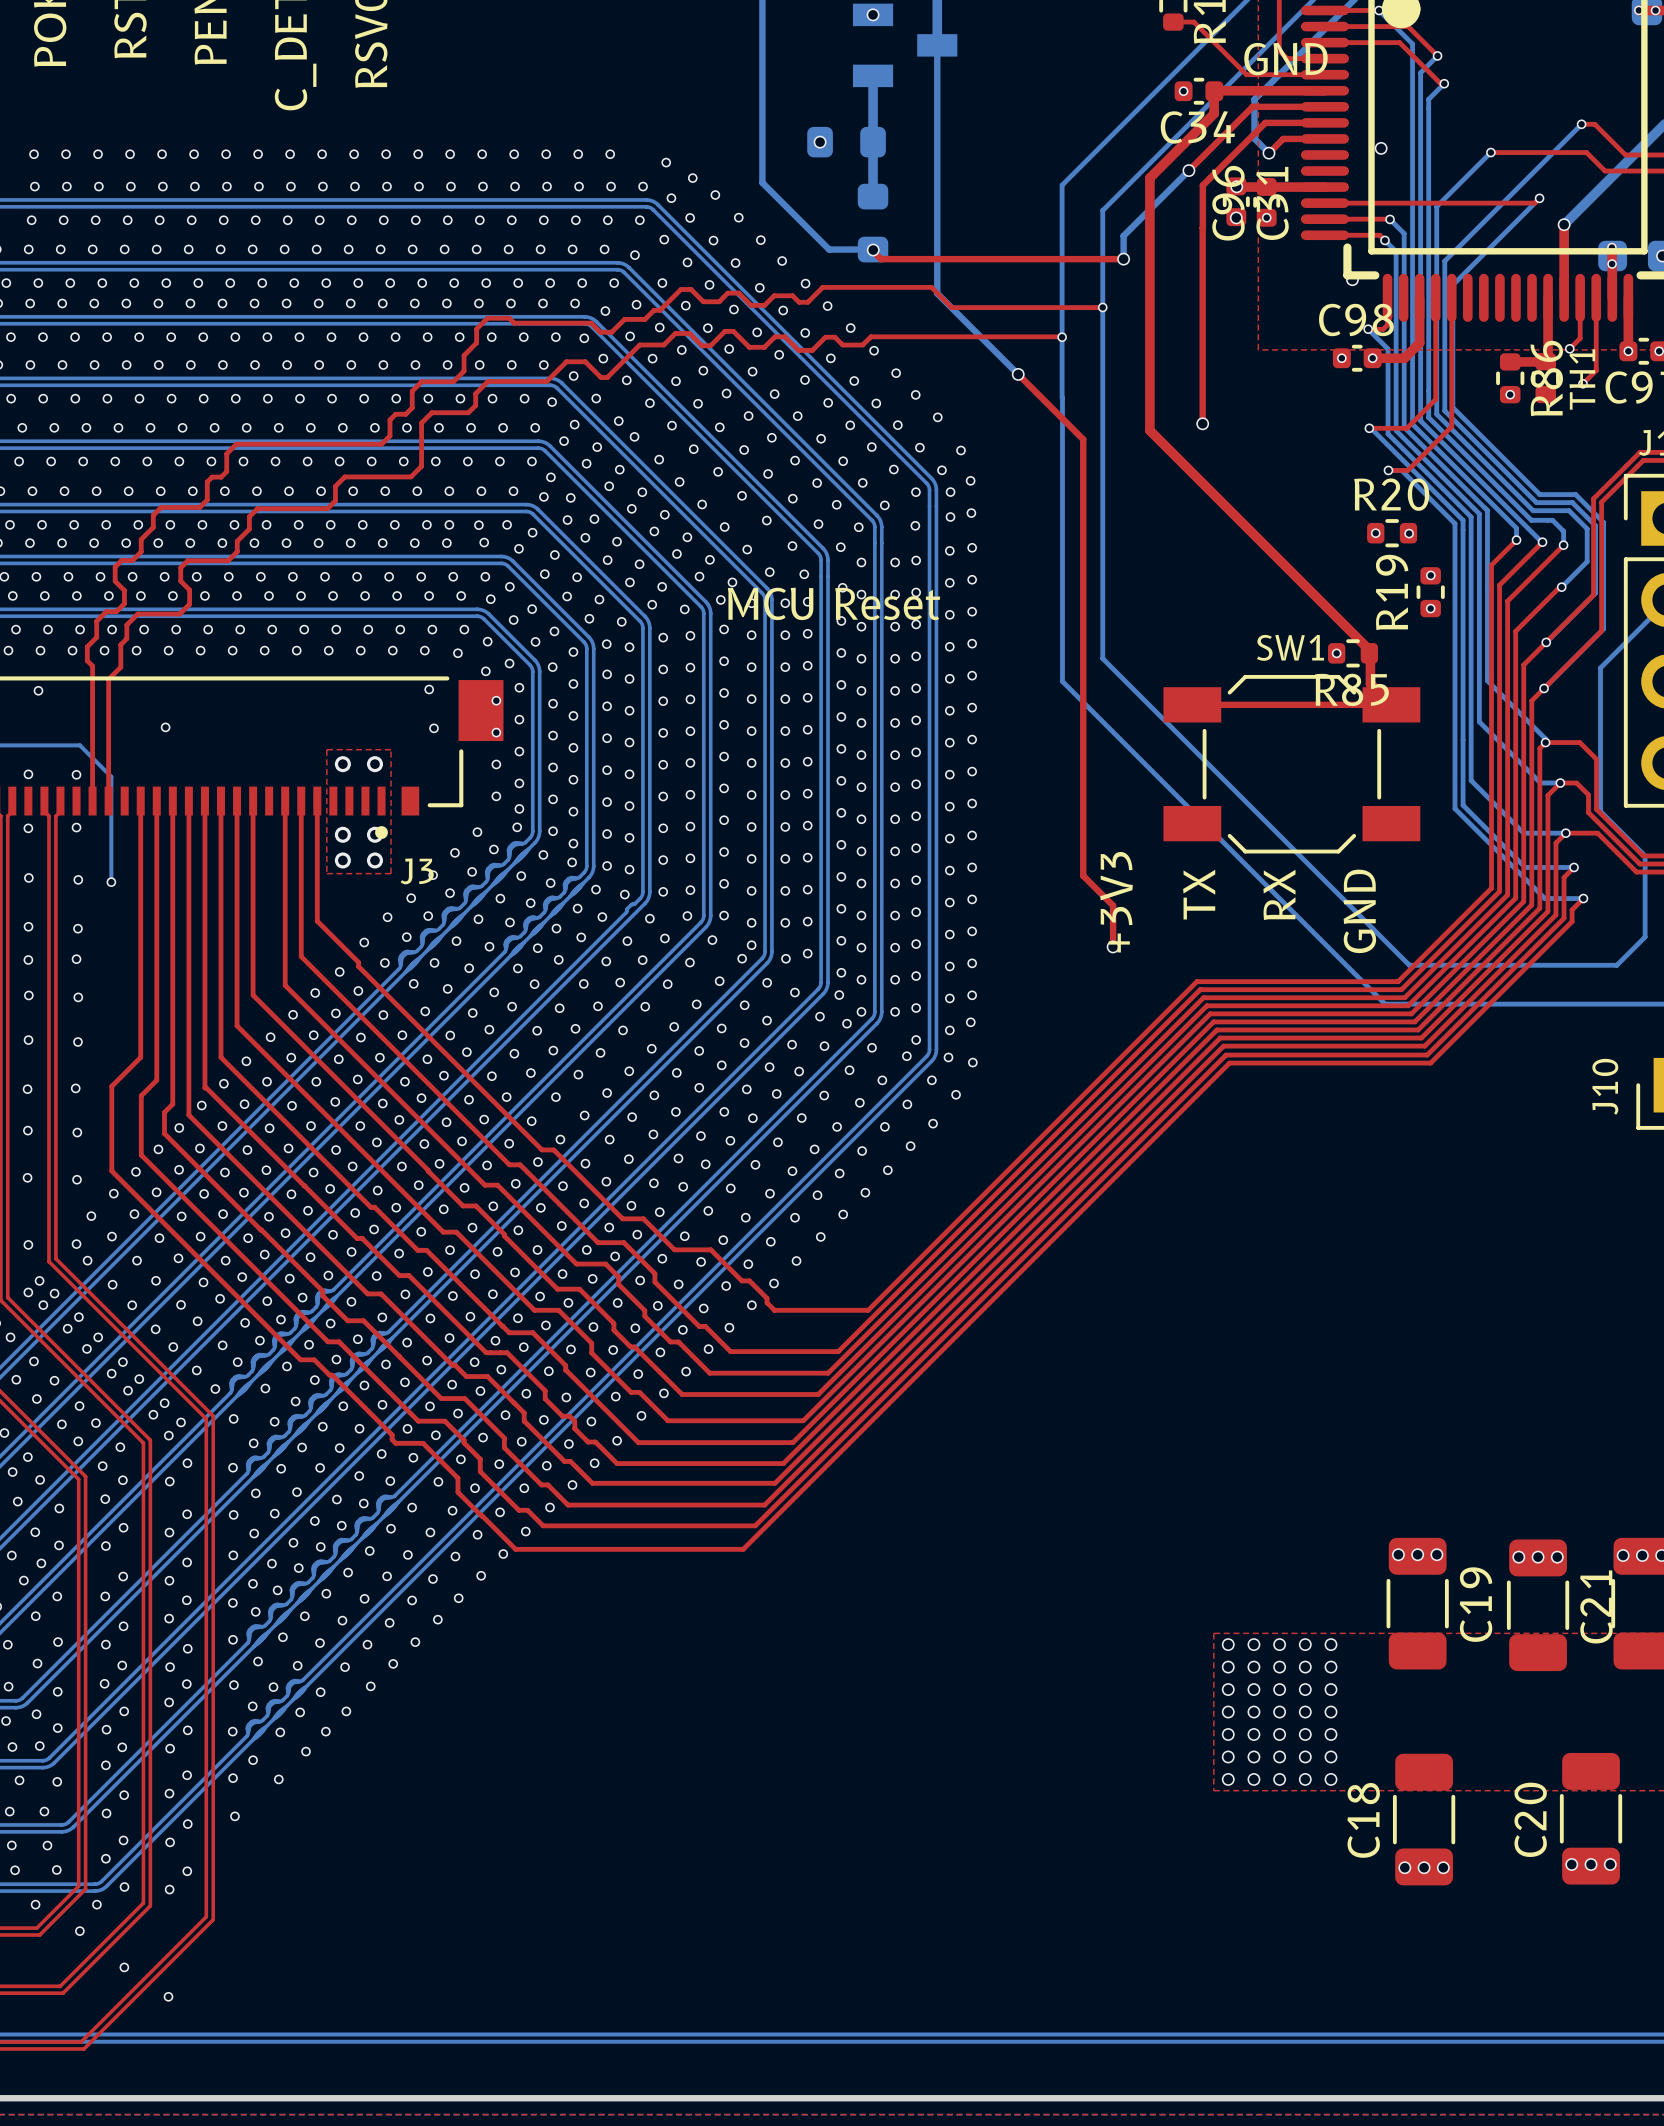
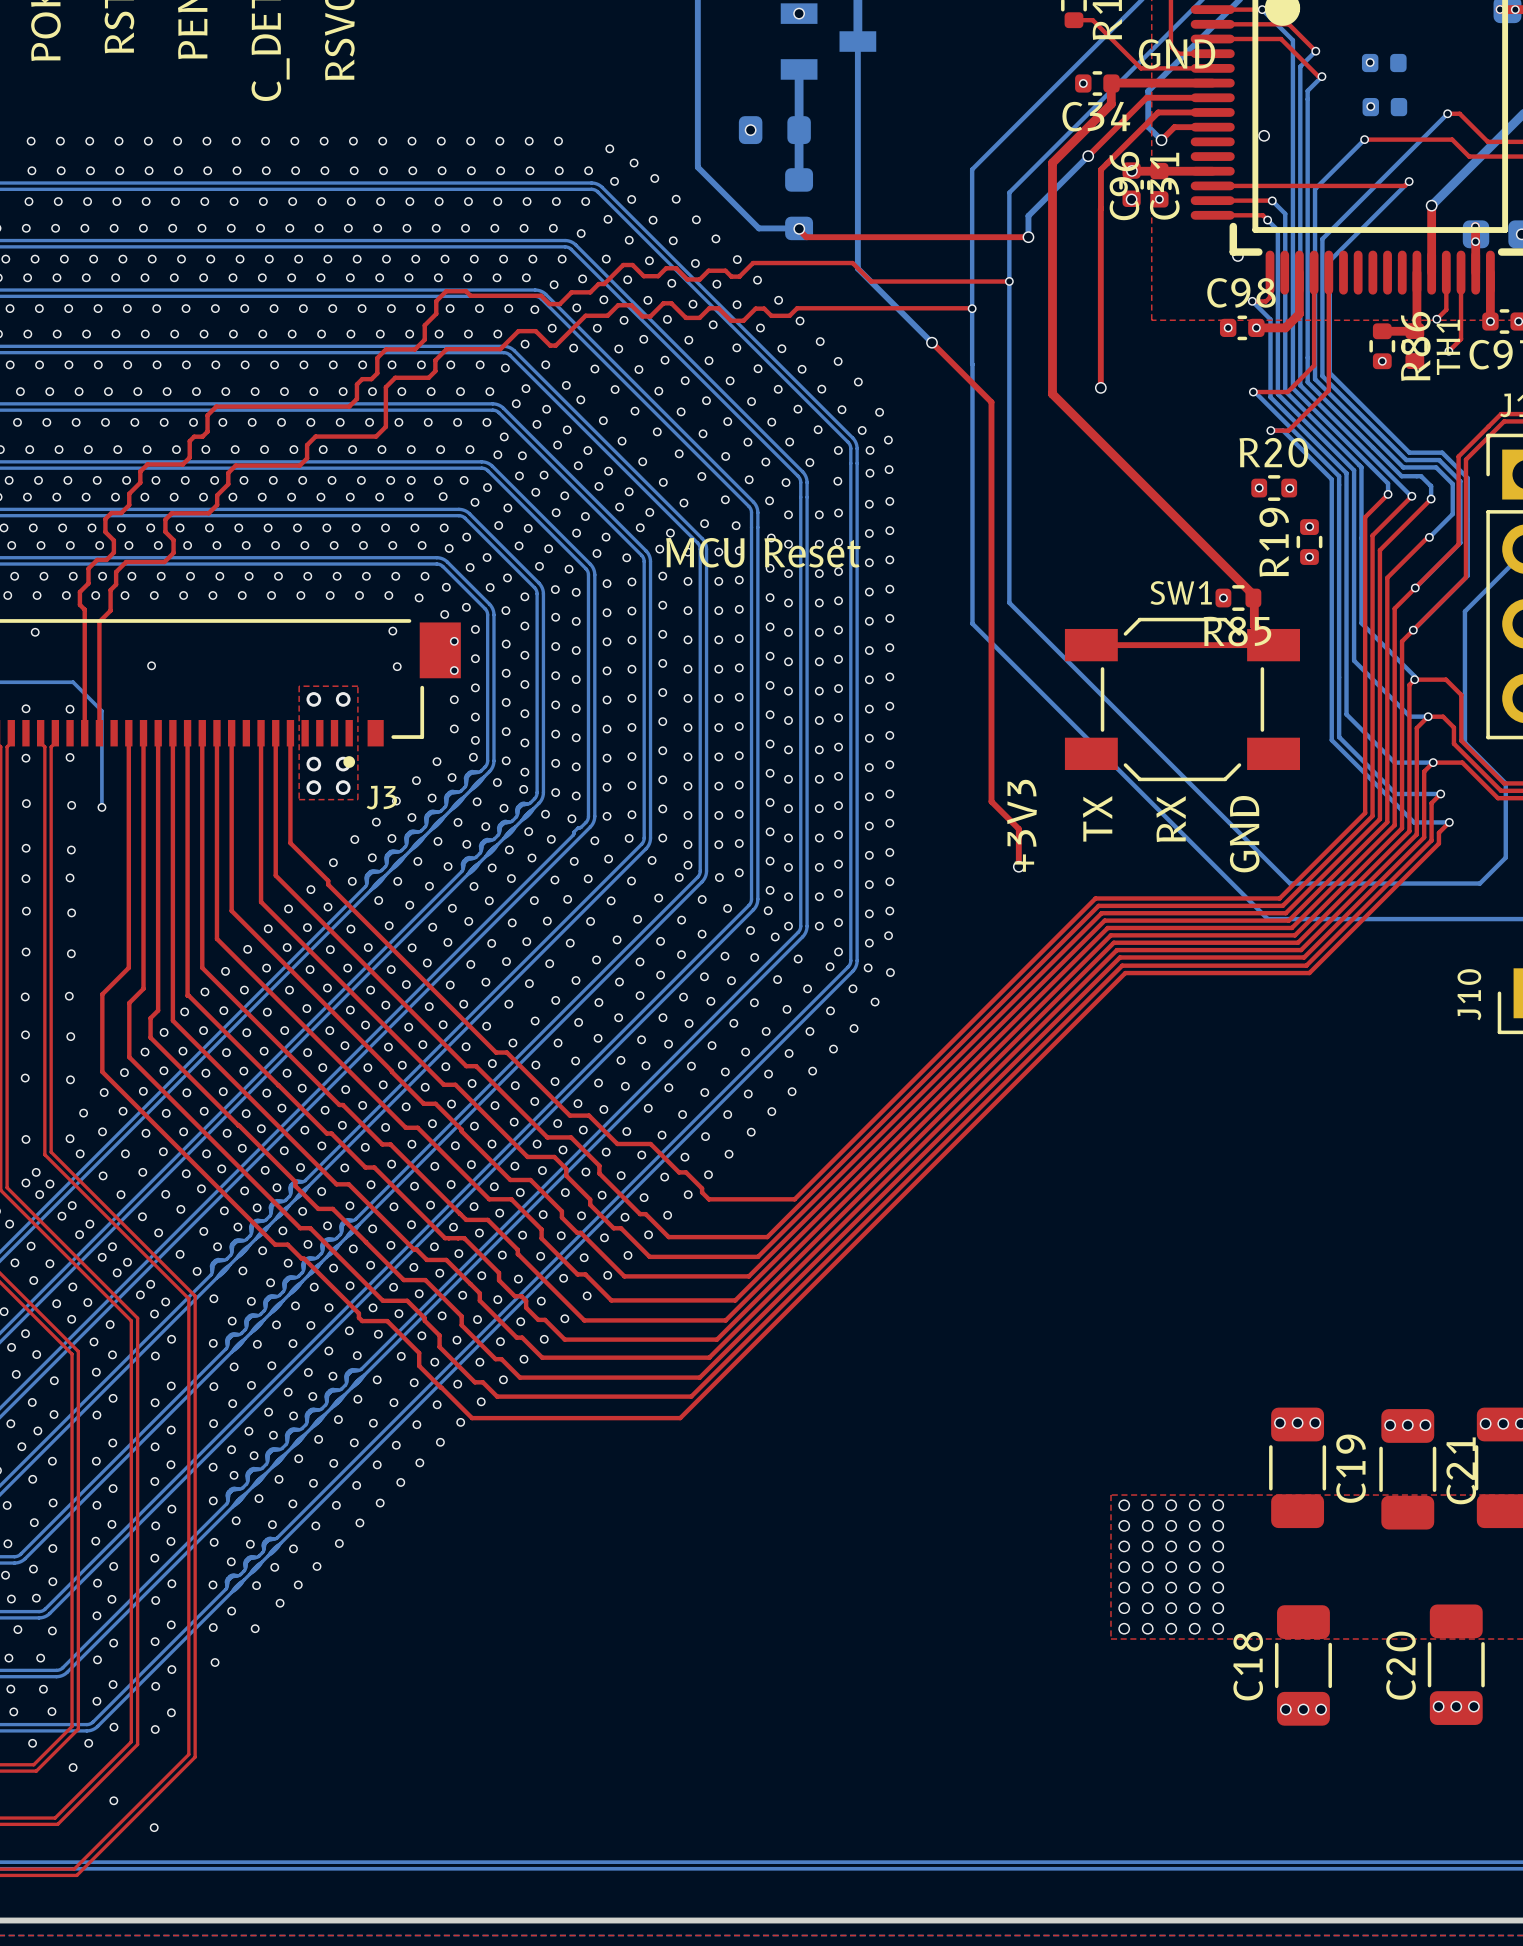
via: none -> (1370, 62)
part: none -> (1384, 63)
via: none -> (1370, 106)
part: none -> (1384, 107)

